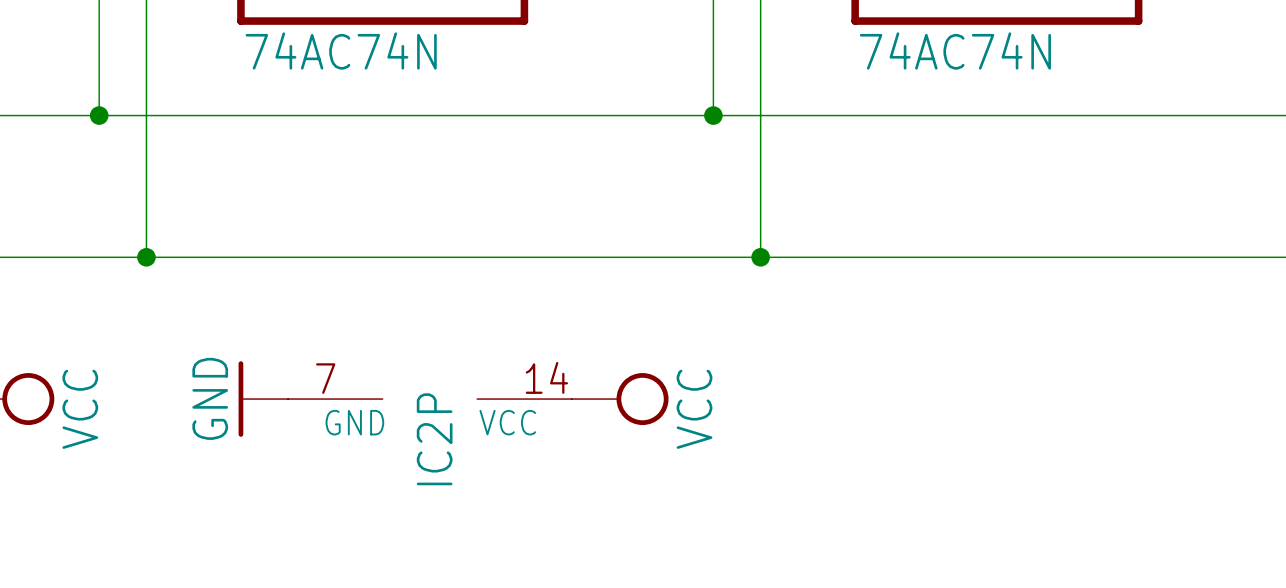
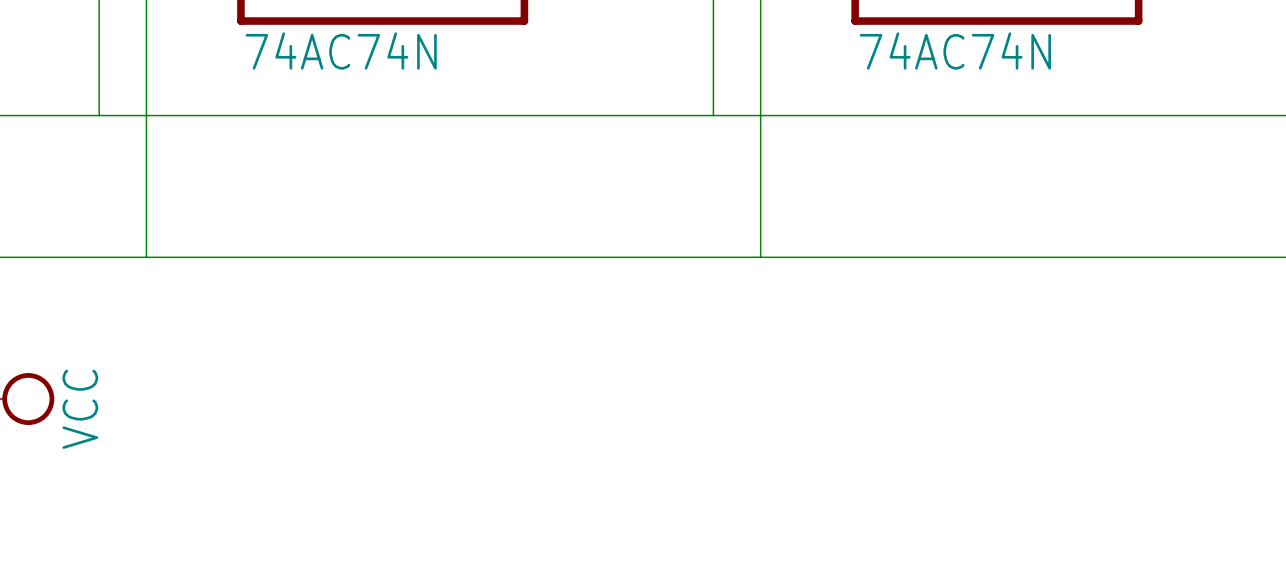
junction: (99, 115) -> none
junction: (713, 115) -> none
junction: (146, 257) -> none
junction: (760, 257) -> none
power symbol: GND (263, 399) -> none
IC2P: (429, 399) -> none
power symbol: VCC (620, 399) -> none

